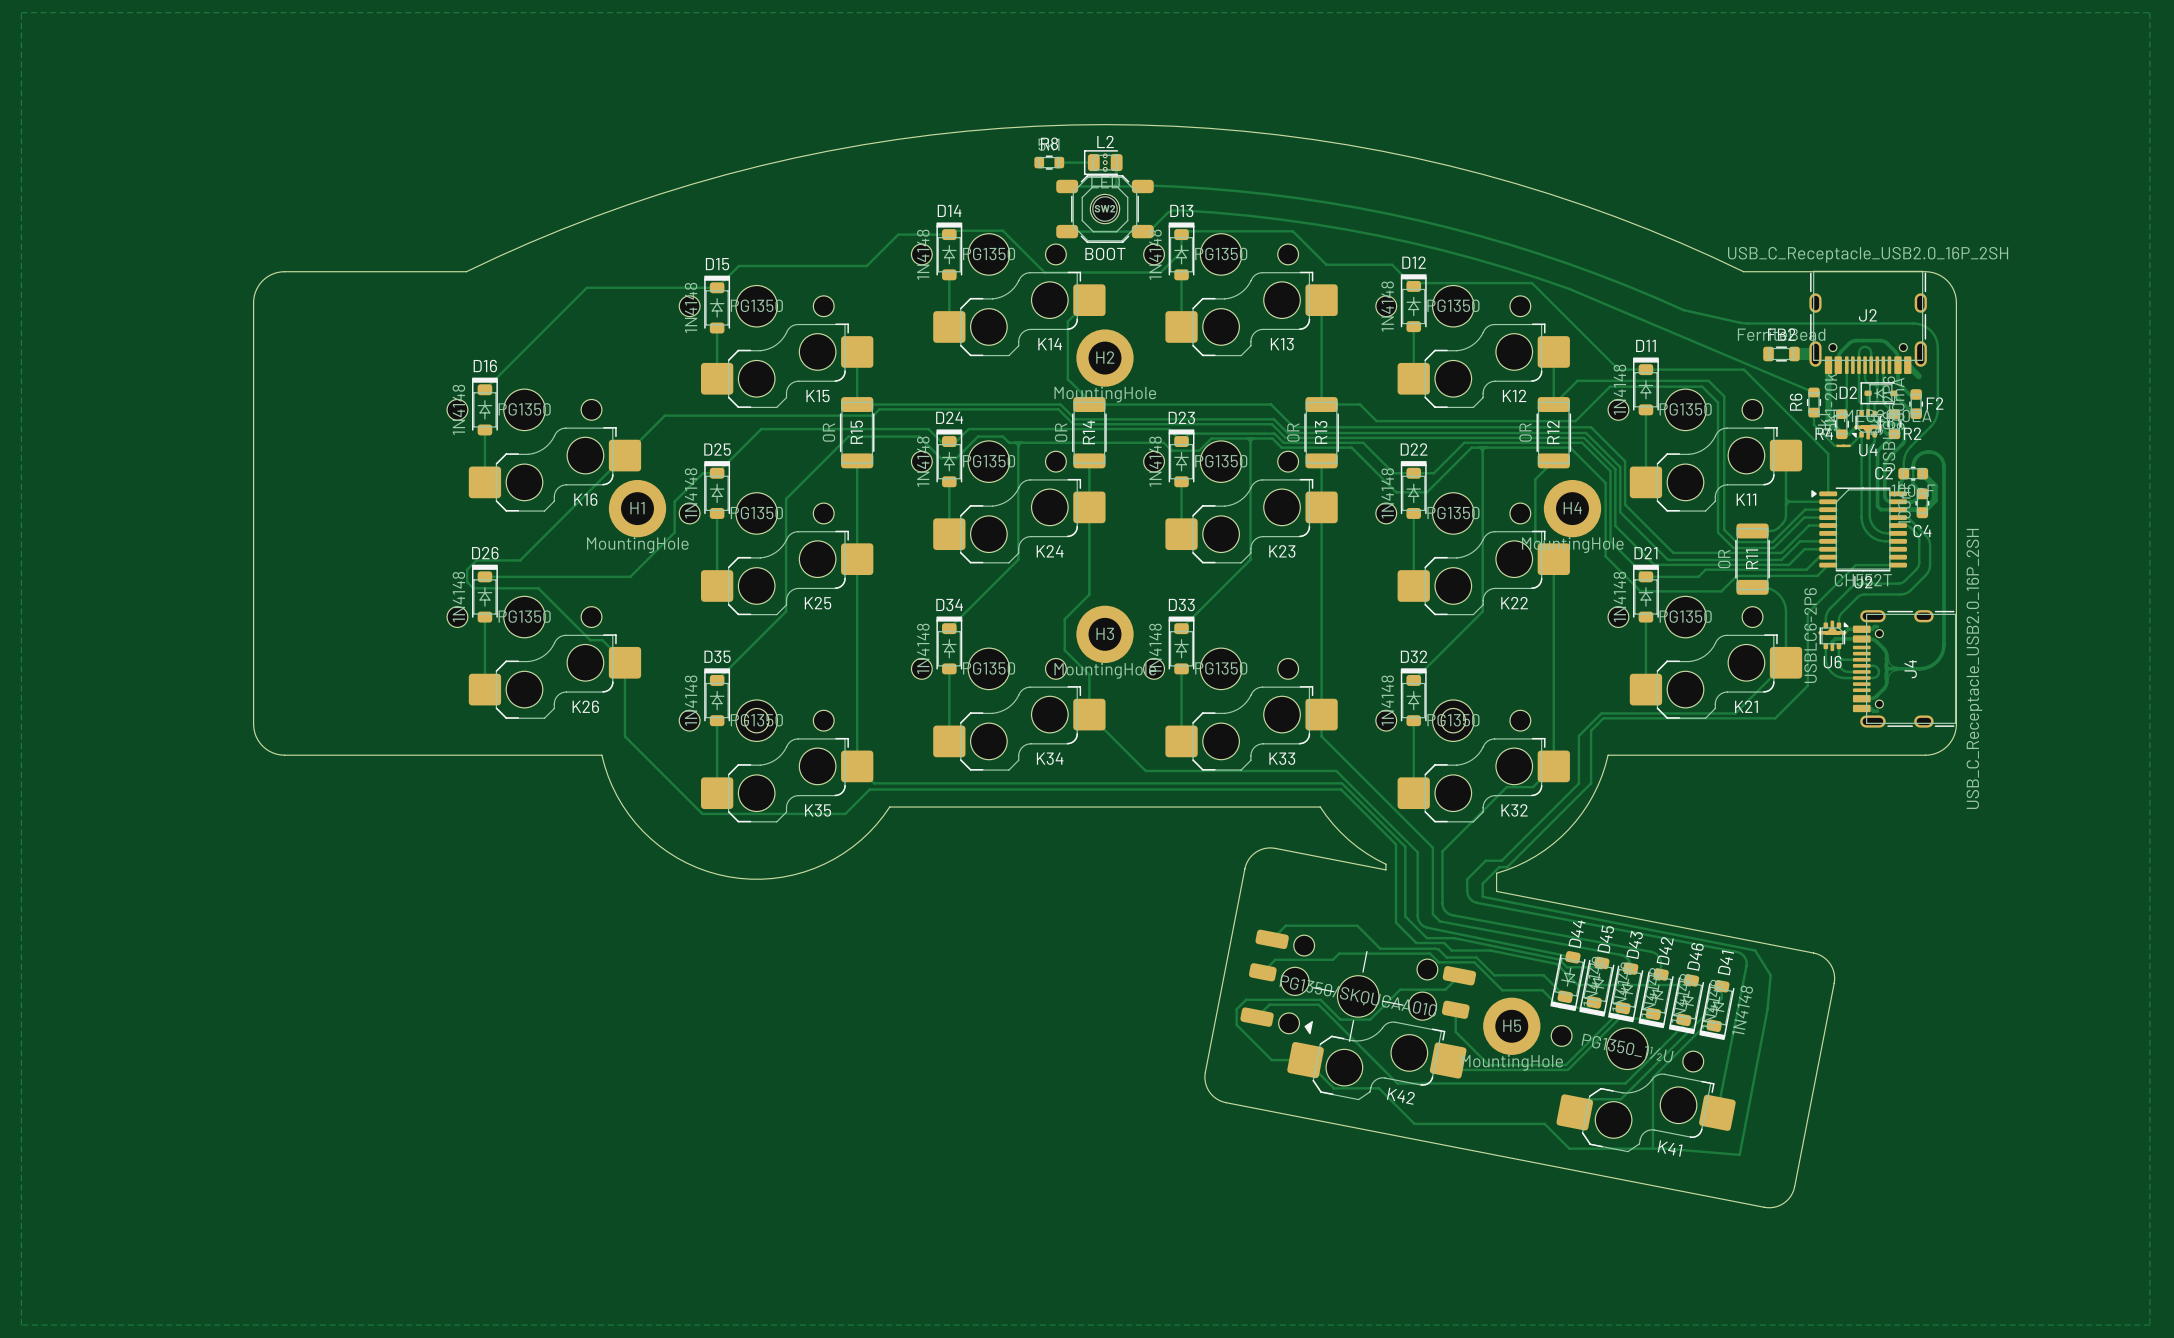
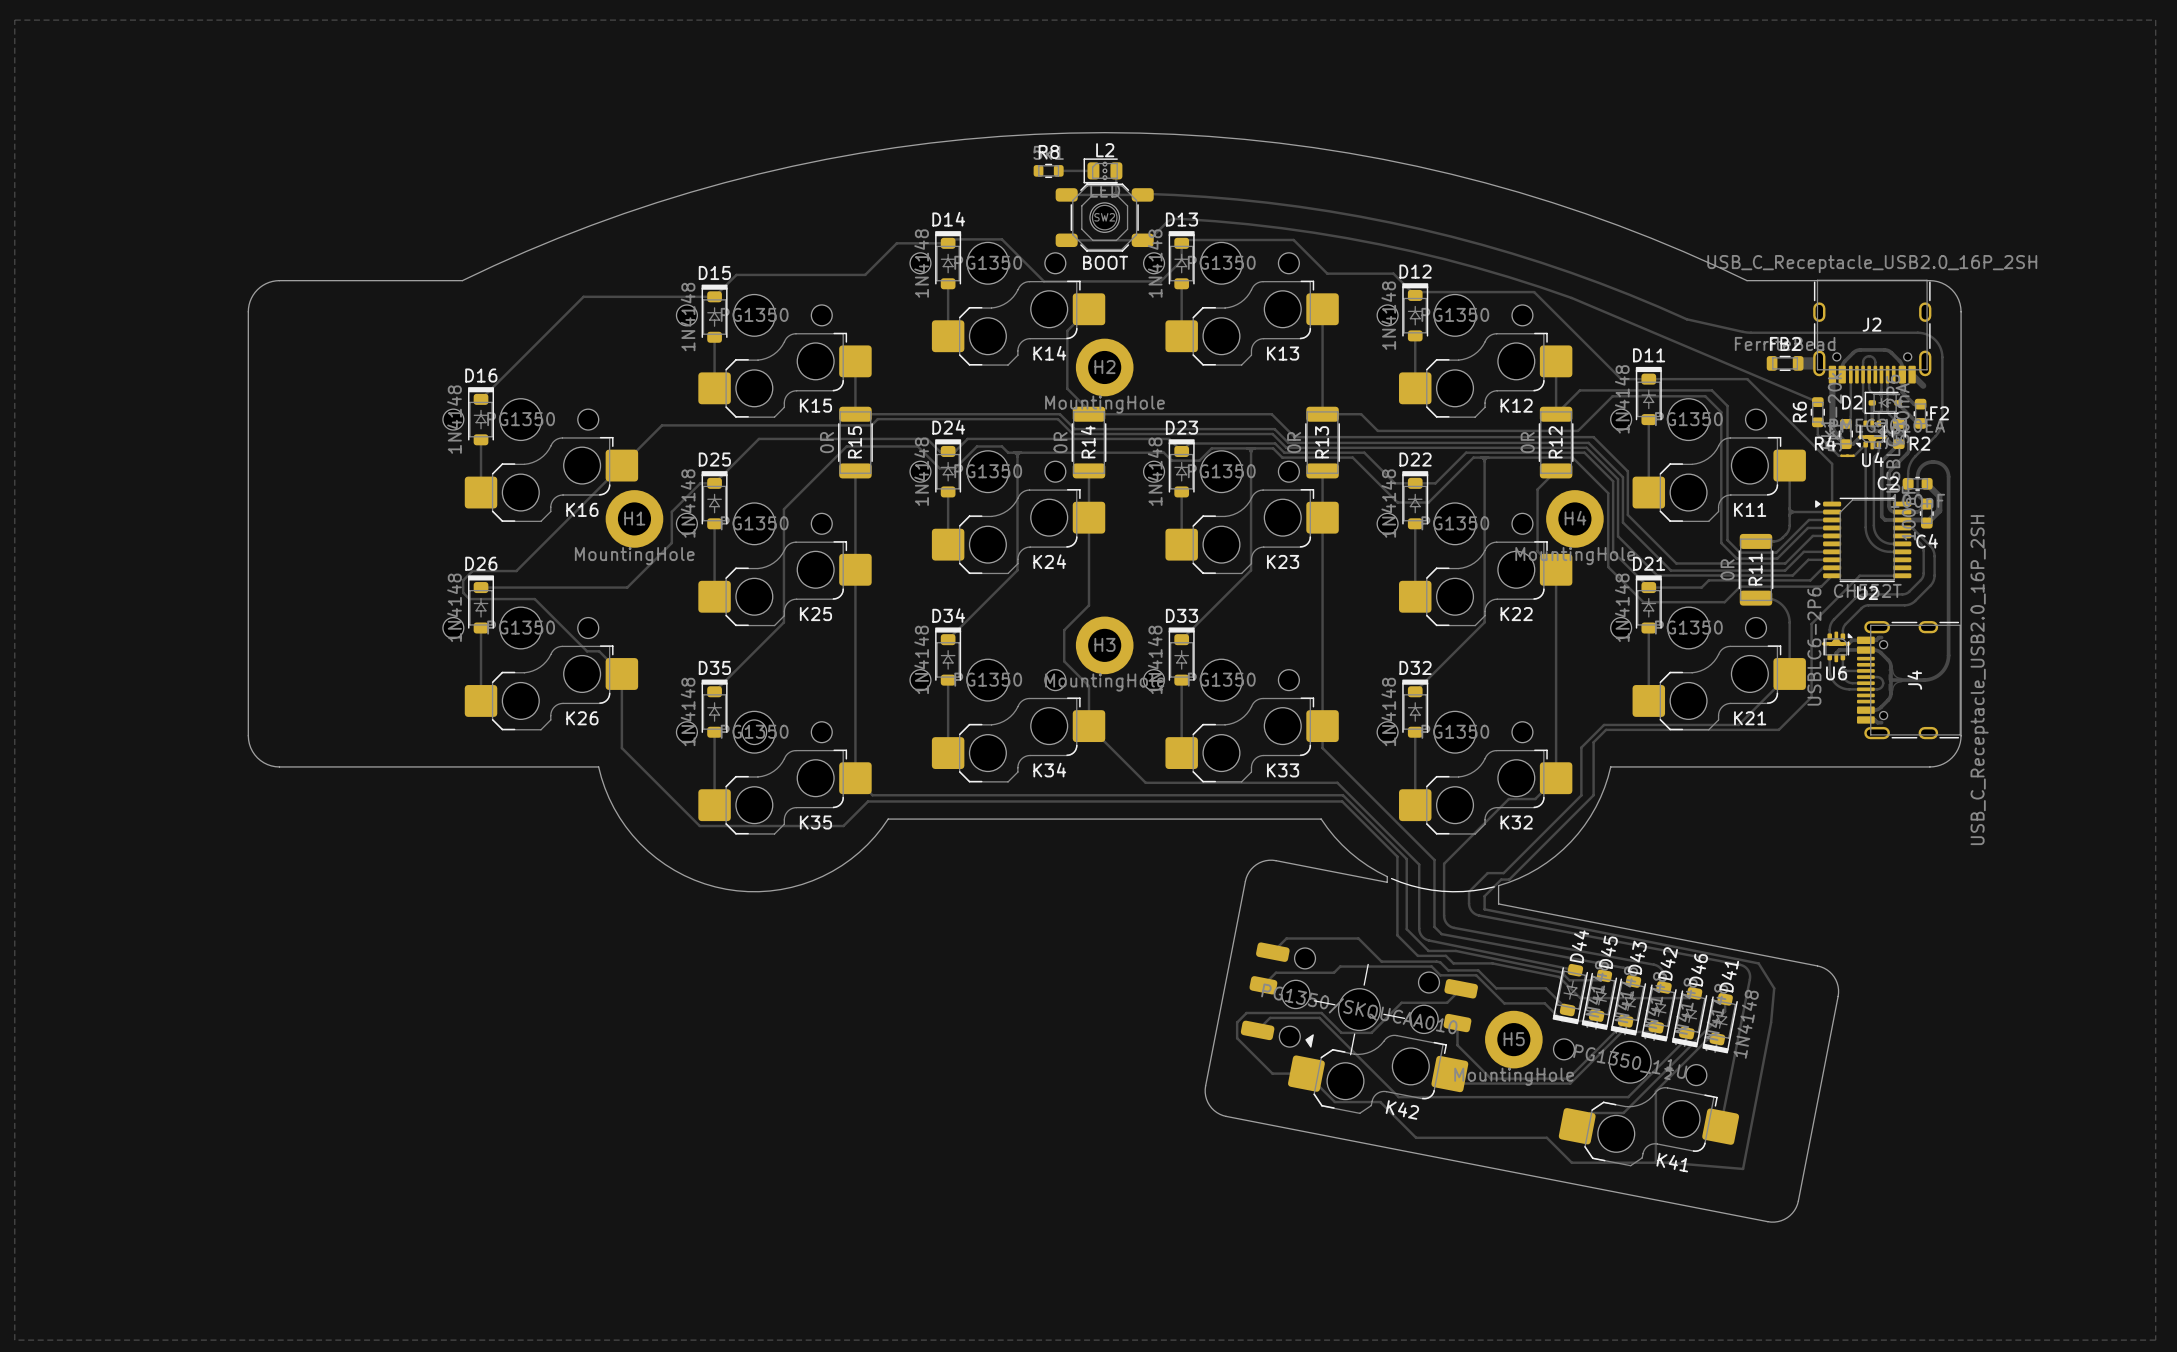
round board edge: [1440, 708, 1466, 734] -> none
line: none -> (1391, 878) (1411, 885) (1442, 891) (1473, 890) (1494, 886)

